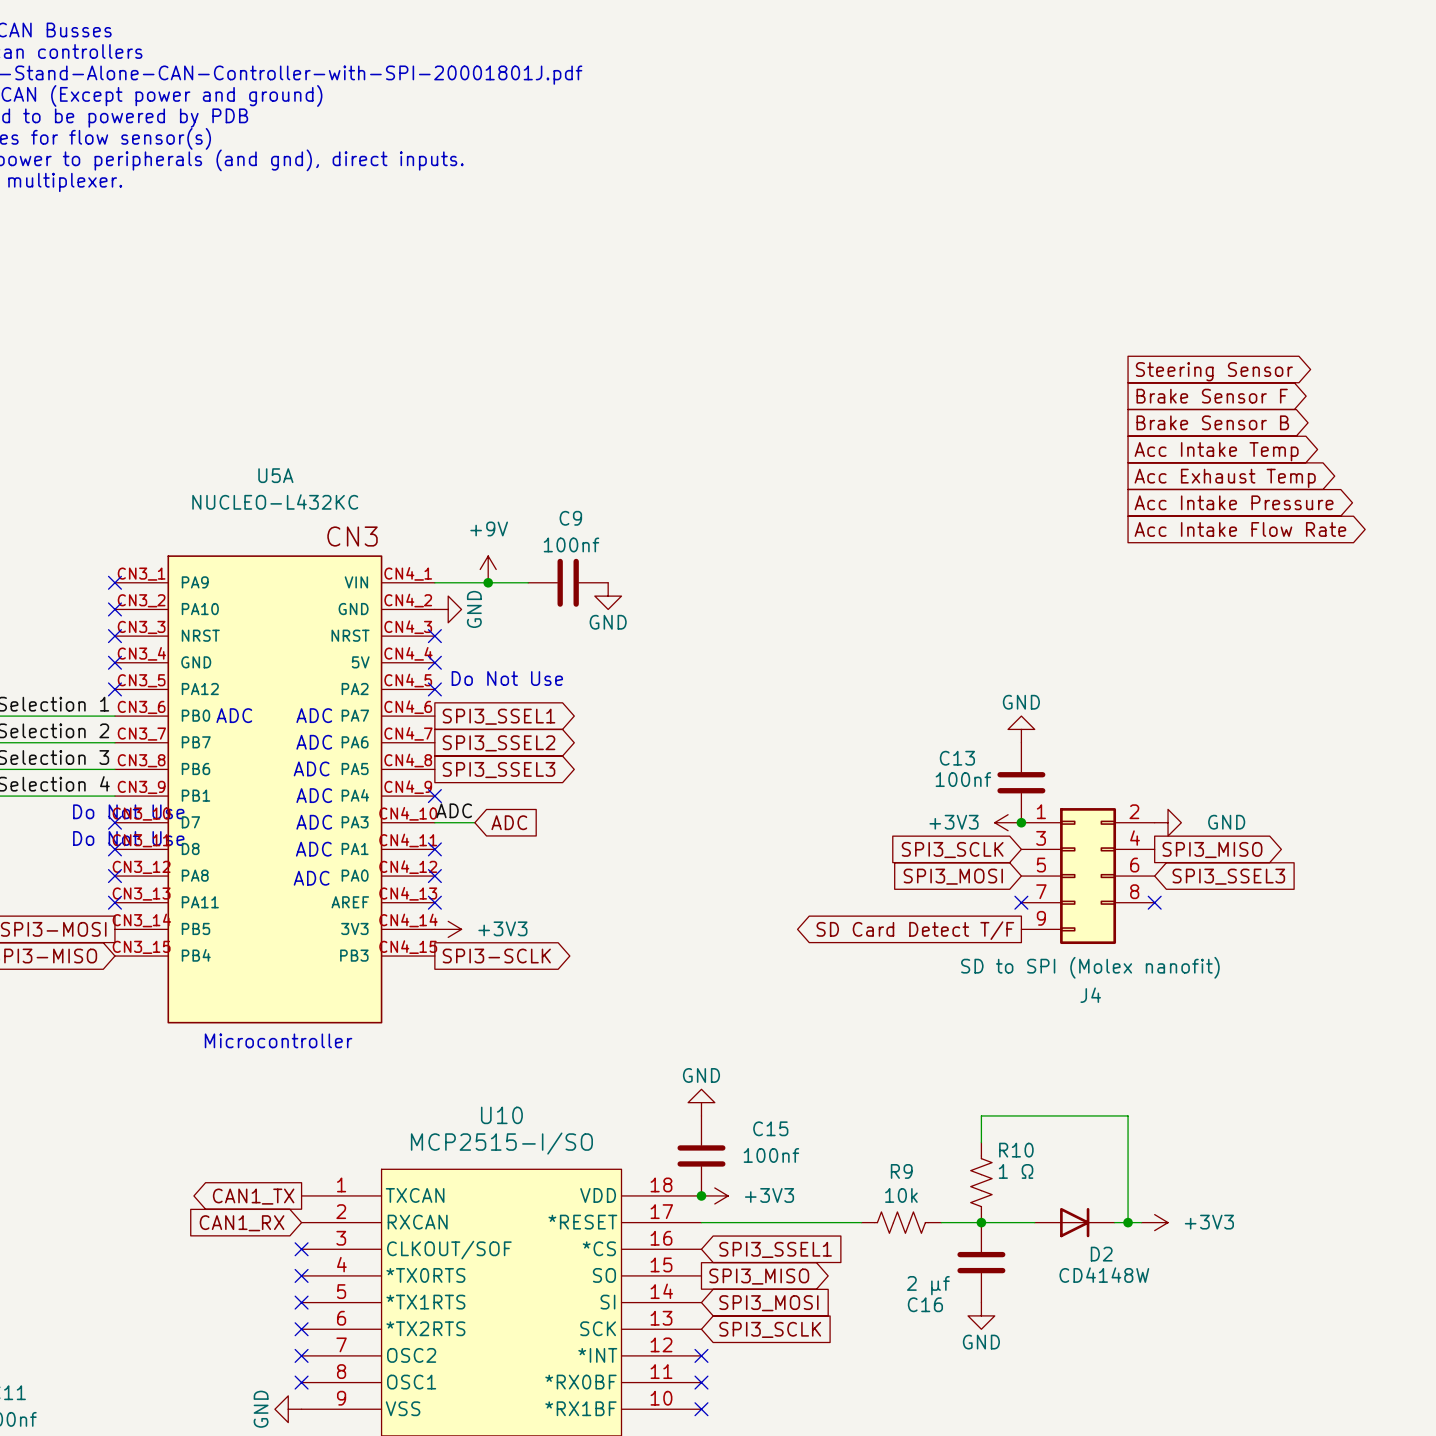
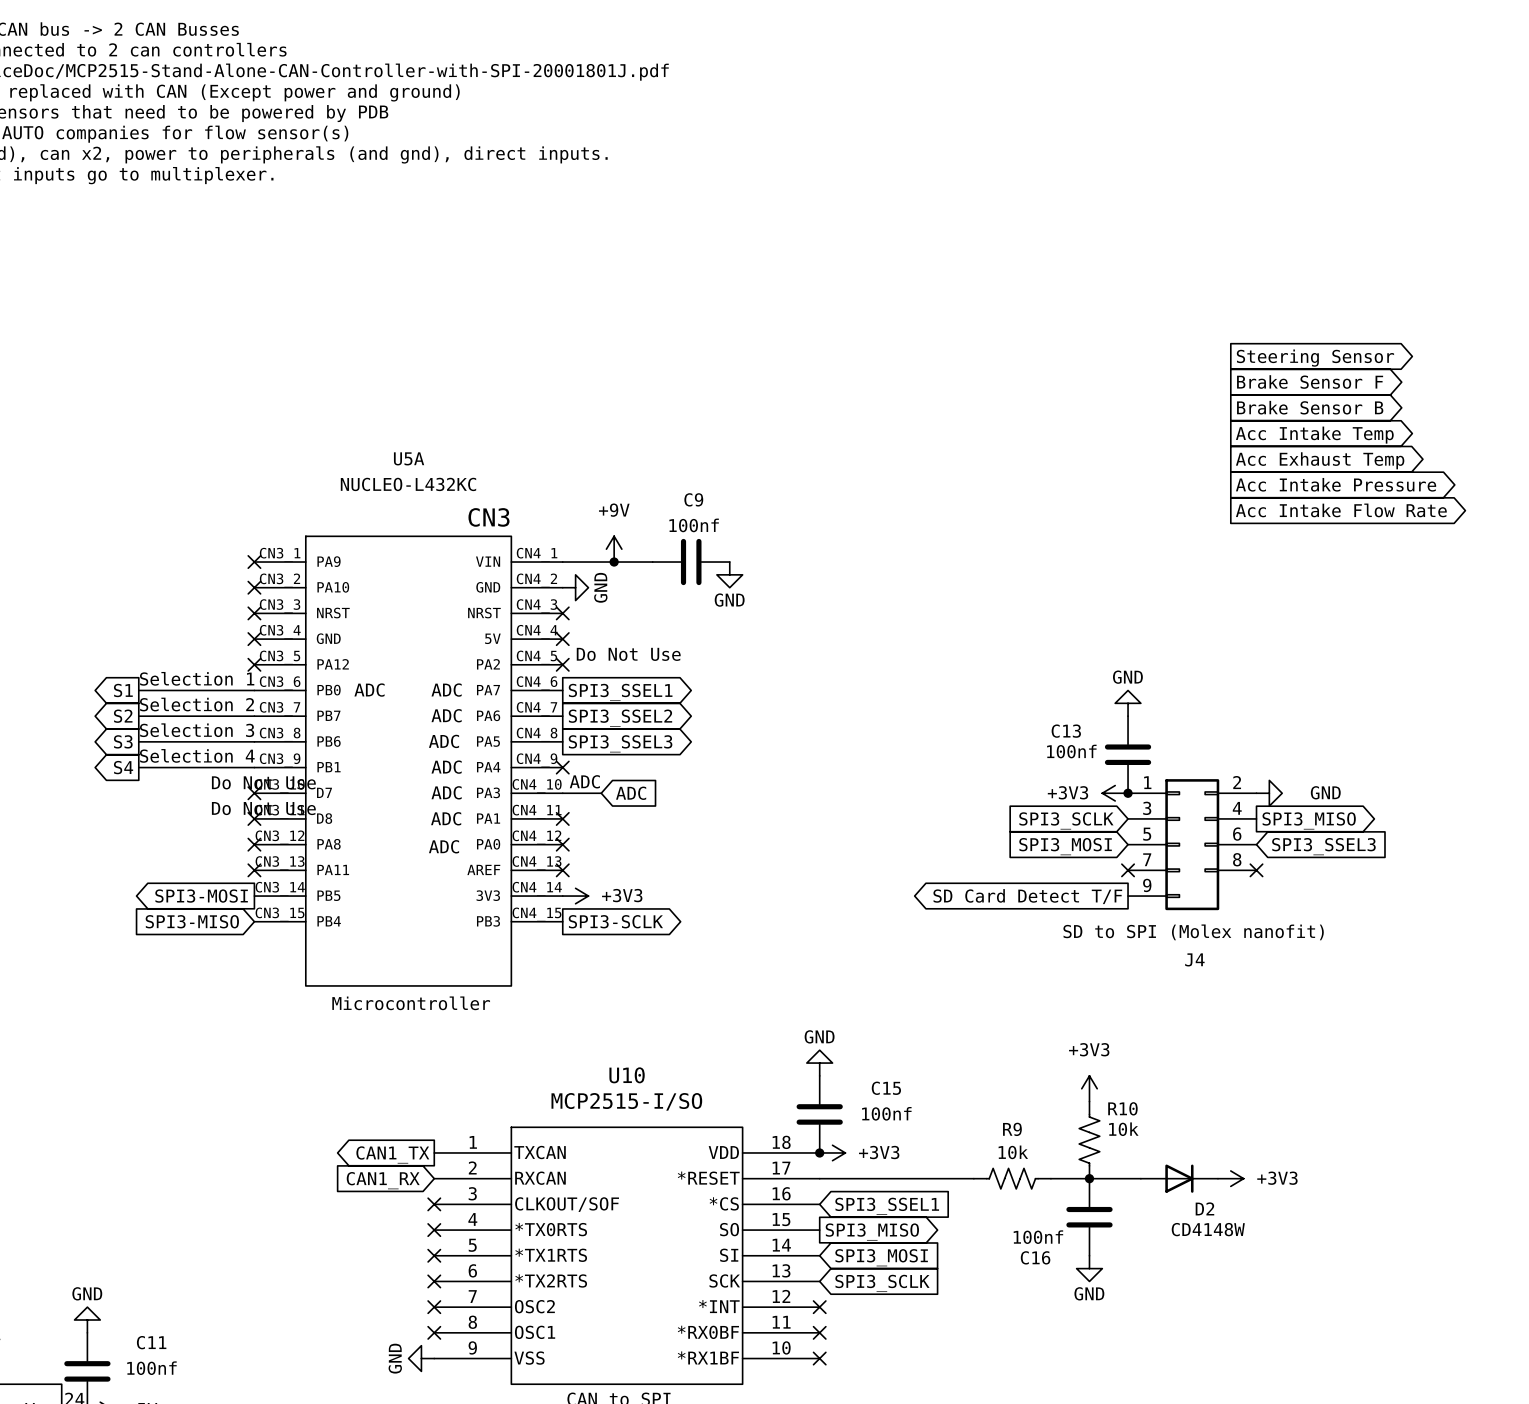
power symbol: none -> +3V3 (1089, 1088)
wire: (981, 1142) (981, 1115) (1128, 1115) (1128, 1222) -> none
R10 value: 1 Ω (1016, 1171) -> 10k (1123, 1129)
junction: (1128, 1222) -> none
power symbol position: +3V3 (1154, 1222) -> +3V3 (1230, 1178)
C16 value: 2 μf (928, 1285) -> 100nf (1038, 1237)

